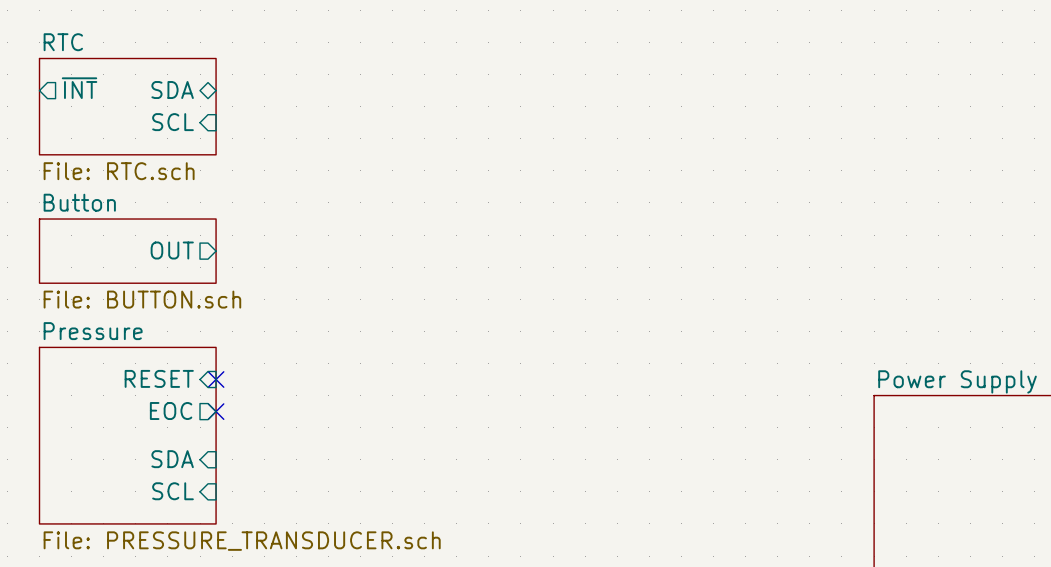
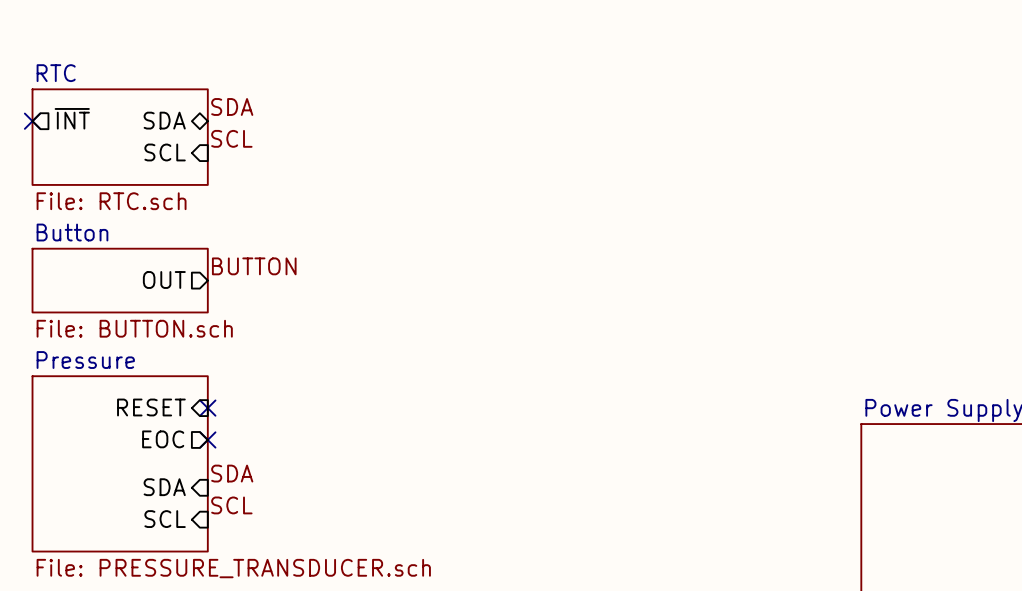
label: none -> SDA (232, 106)
no-connect mark: none -> (32, 121)
label: none -> SCL (231, 138)
label: none -> BUTTON (254, 266)
label: none -> SDA (232, 473)
label: none -> SCL (231, 505)

